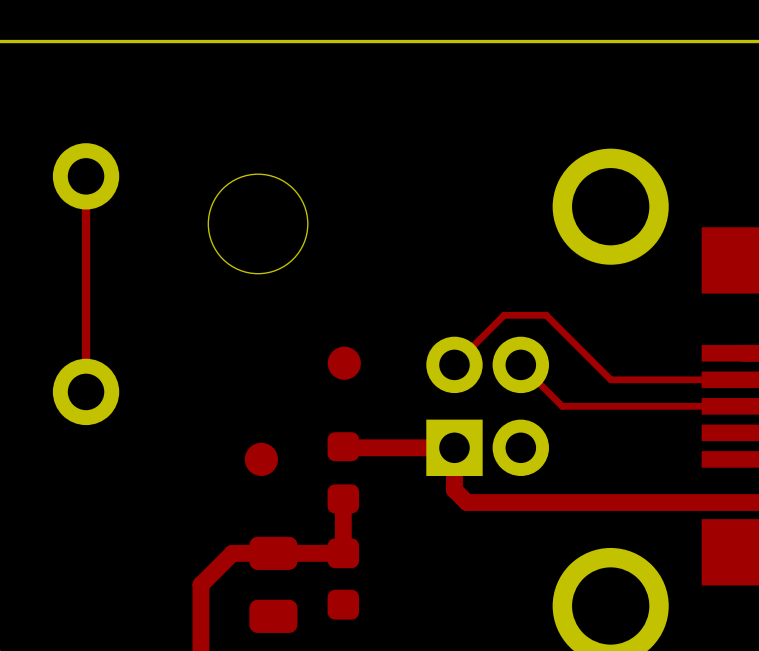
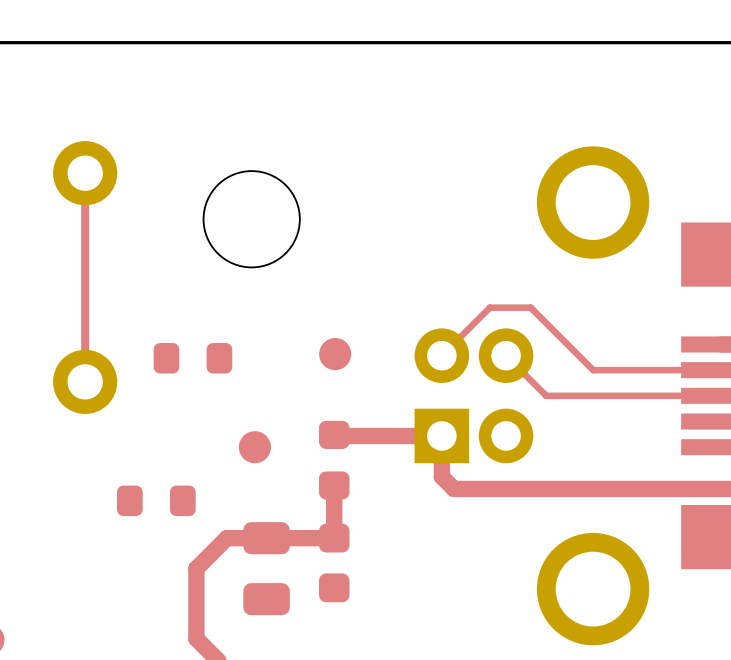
part: none -> (192, 358)
part: none -> (156, 500)

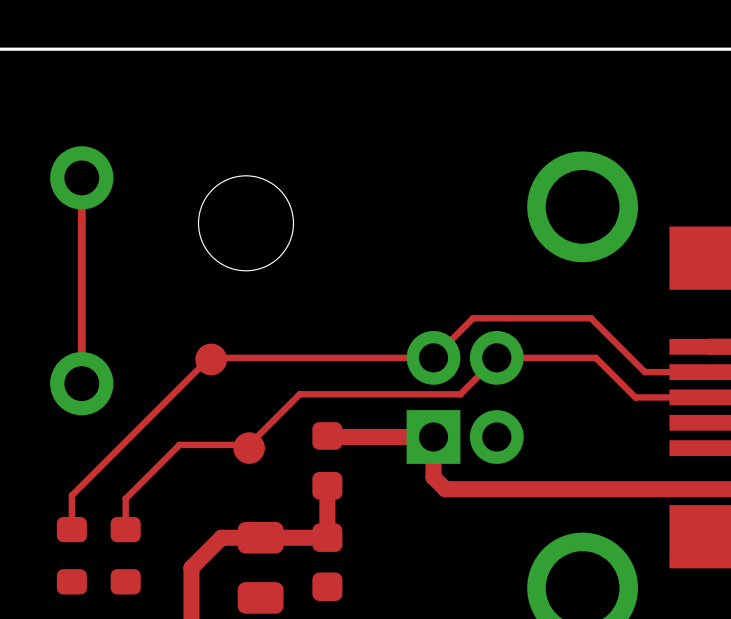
top track: (481, 315) (489, 307) (530, 307) (593, 370) (656, 370) -> (473, 318) (591, 318) (644, 372)
part footprint: [153, 343, 233, 374] -> [195, 343, 228, 376]
part: (335, 354) -> none
top track: none -> (433, 357) (212, 357) (208, 359) (71, 495) (71, 529)
top track: (506, 355) (546, 395) (646, 395) -> (125, 529) (125, 498) (179, 444) (249, 444) (299, 394) (460, 394) (496, 357) (595, 357) (635, 397)
part: (156, 500) -> none
part: none -> (71, 555)
part: none -> (125, 555)

